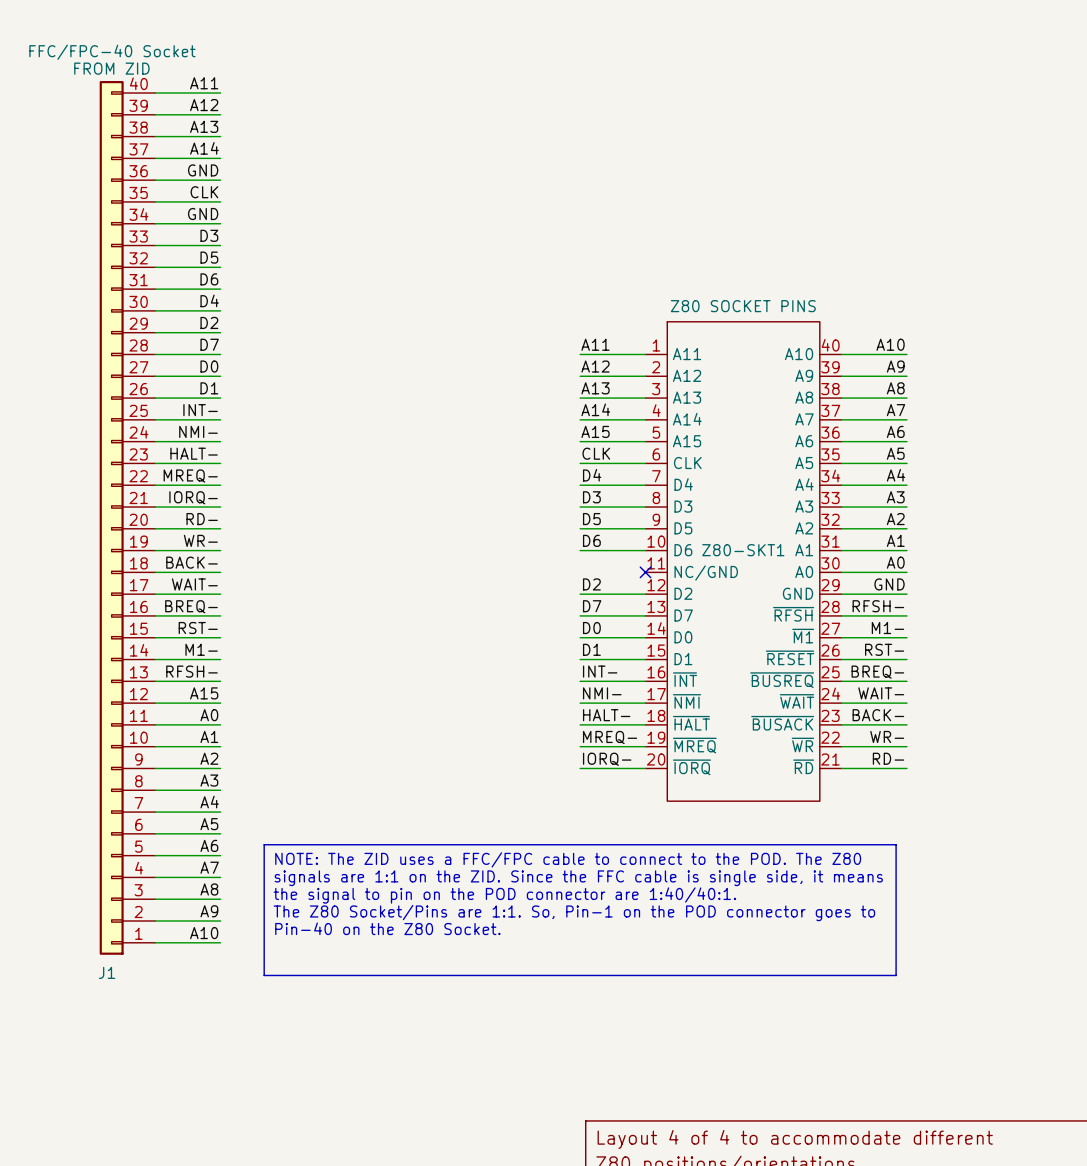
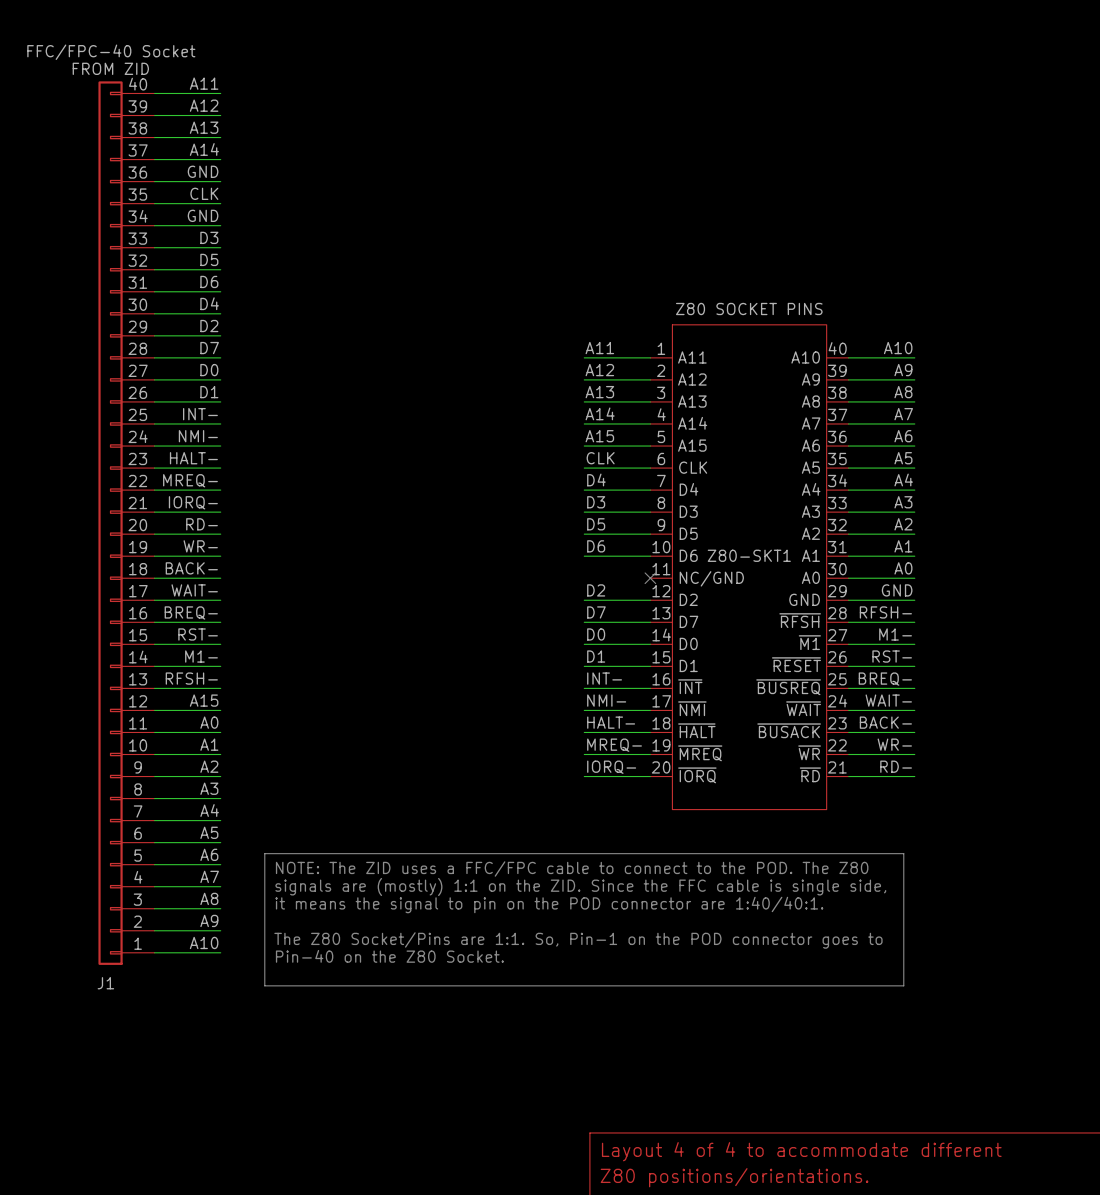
text: signals are 1:1 on the ZID. Since the FFC cable is single side, it means (578, 878) -> signals are (mostly) 1:1 on the ZID. Since the FFC cable is single side, (580, 886)
text: the signal to pin on the POD connector are 1:40/40:1. (504, 895) -> it means the signal to pin on the POD connector are 1:40/40:1. (549, 904)
text: The Z80 Socket/Pins are 1:1. So, Pin-1 on the POD connector goes to (574, 913) -> none
text: Pin-40 on the Z80 Socket. (387, 928) -> The Z80 Socket/Pins are 1:1. So, Pin-1 on the POD connector goes to (578, 940)
text: none -> Pin-40 on the Z80 Socket. (389, 956)

